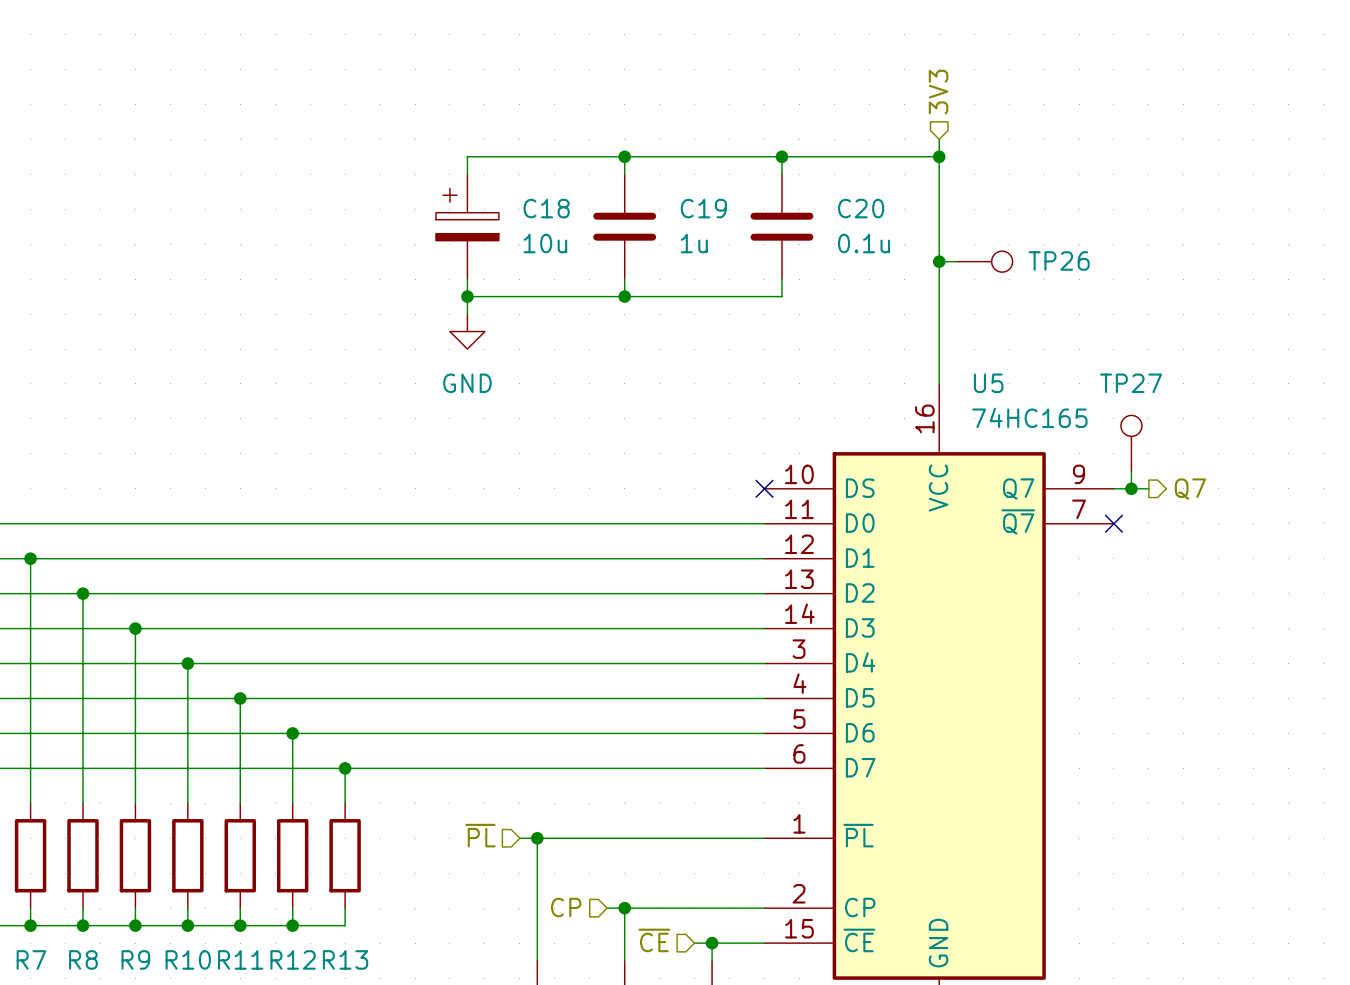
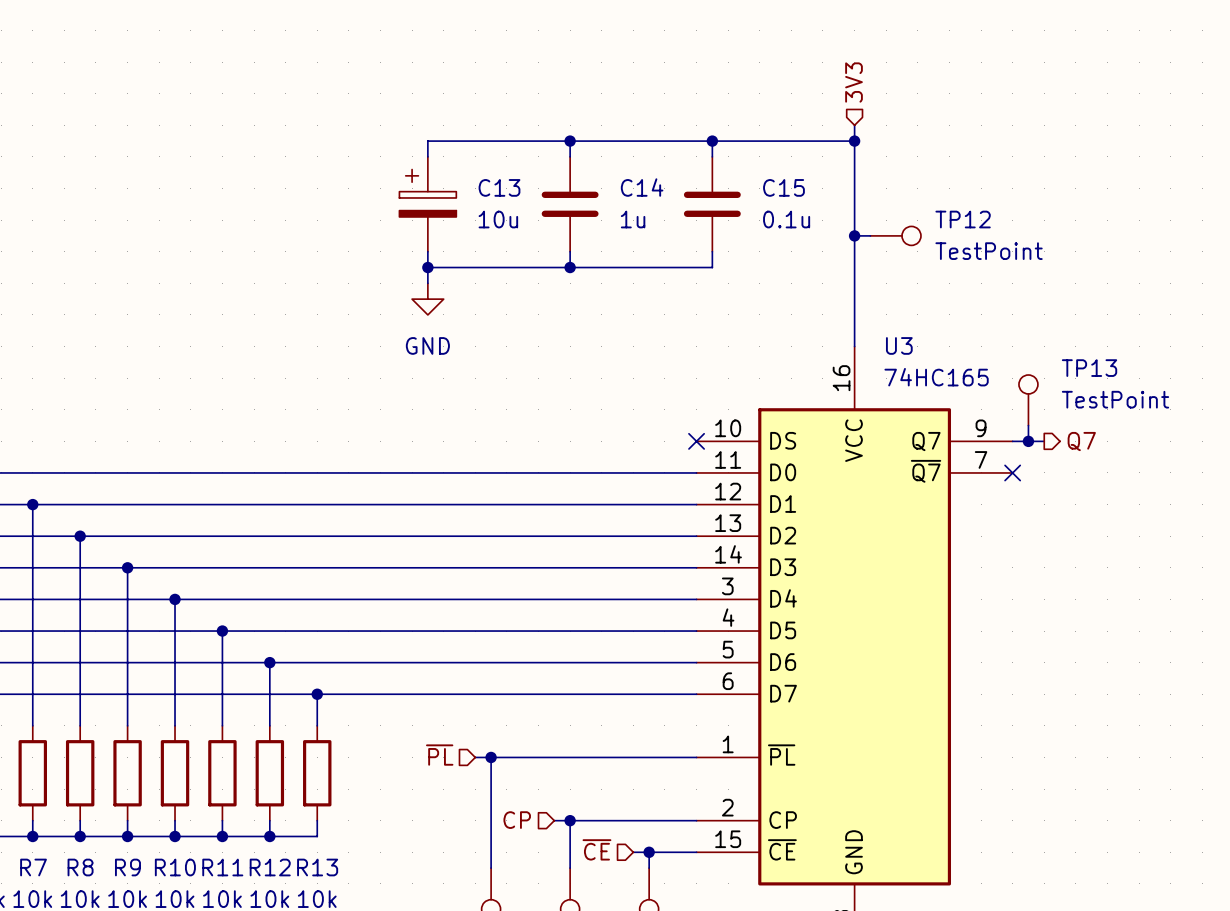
C18 name: C18 (546, 208) -> C13 (499, 187)
C19 name: C19 (703, 208) -> C14 (642, 187)
C20 name: C20 (861, 208) -> C15 (783, 187)
TP26 name: TP26 (1059, 260) -> TP12 (963, 219)
TP26 value: none -> TestPoint (989, 251)
U5 name: U5 (988, 383) -> U3 (899, 345)
TP27 name: TP27 (1131, 383) -> TP13 (1089, 368)
TP27 value: none -> TestPoint (1115, 399)

